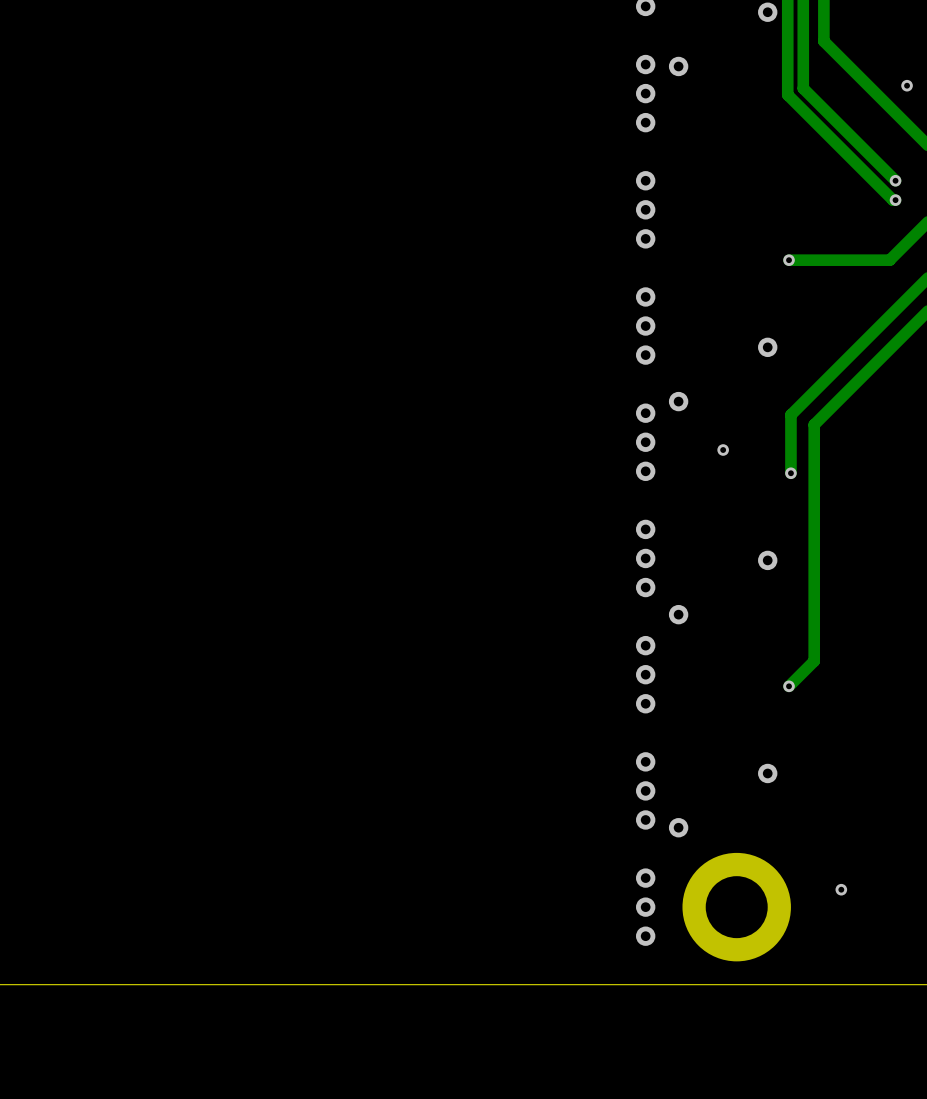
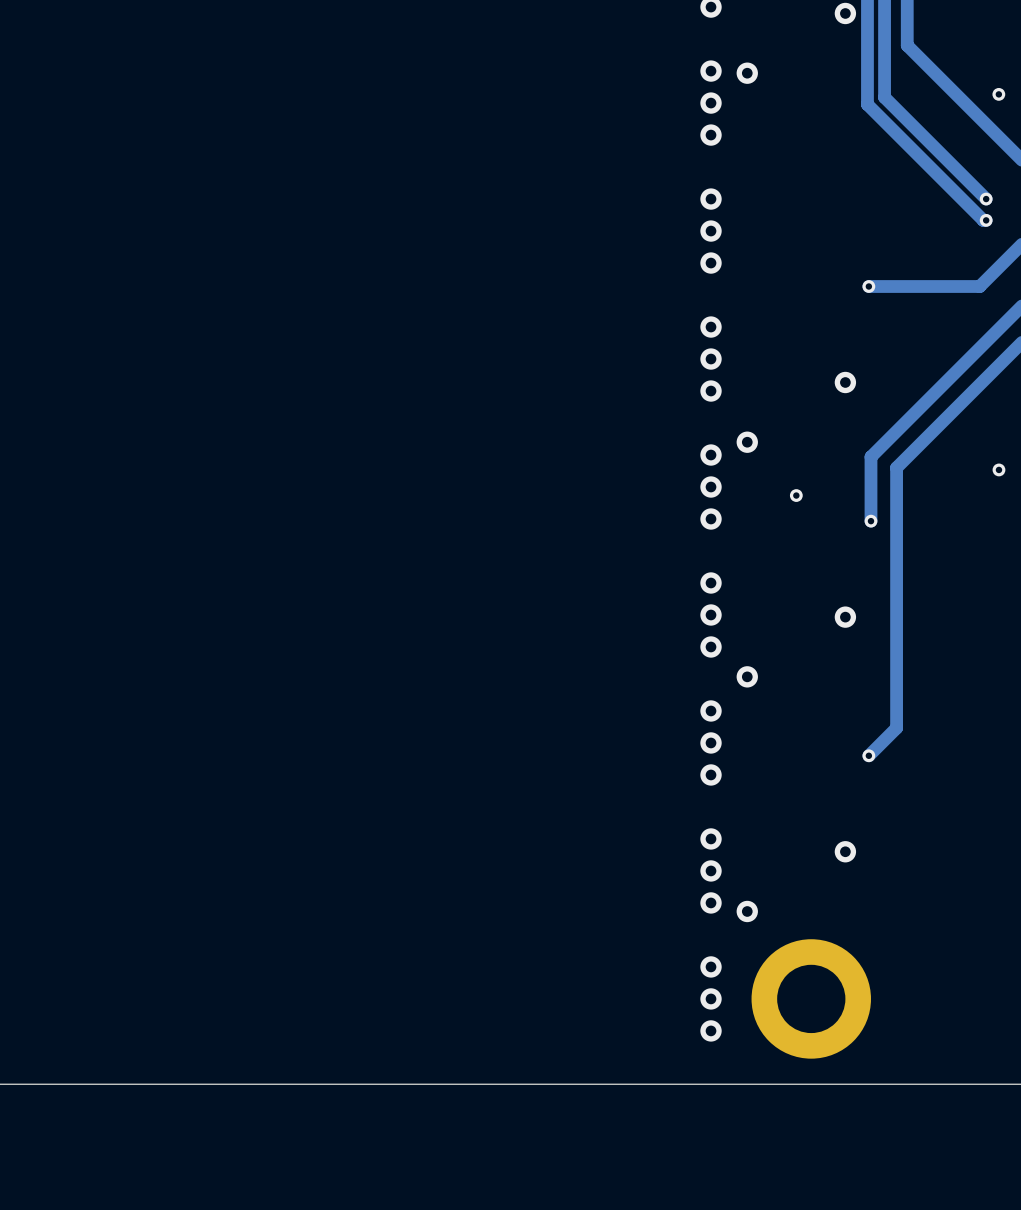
via: none -> (998, 469)
via: (841, 889) -> none

